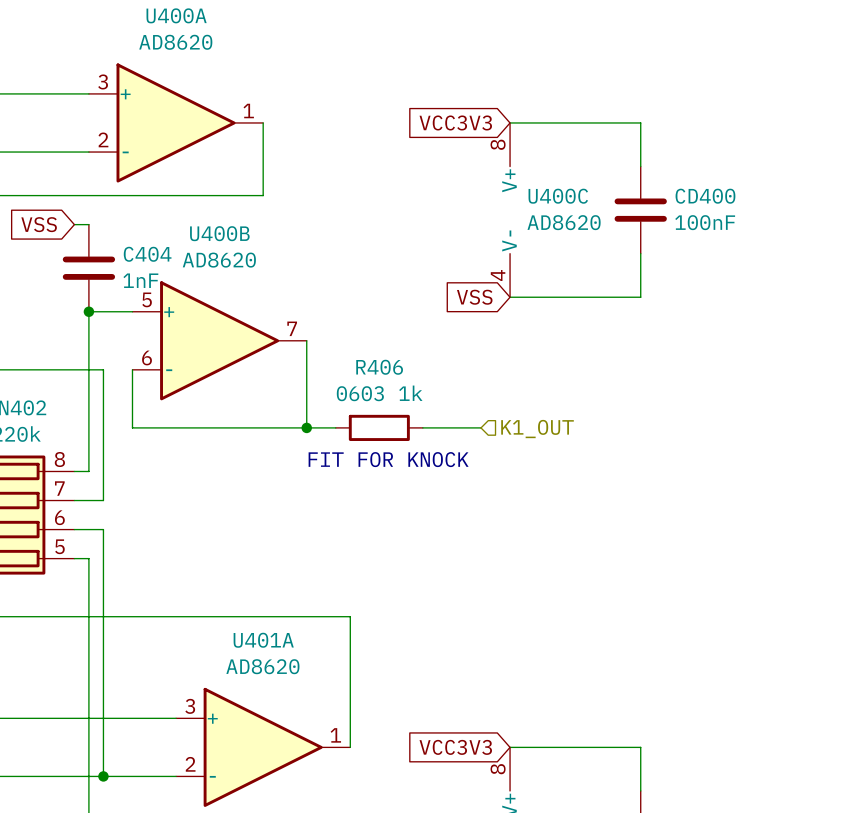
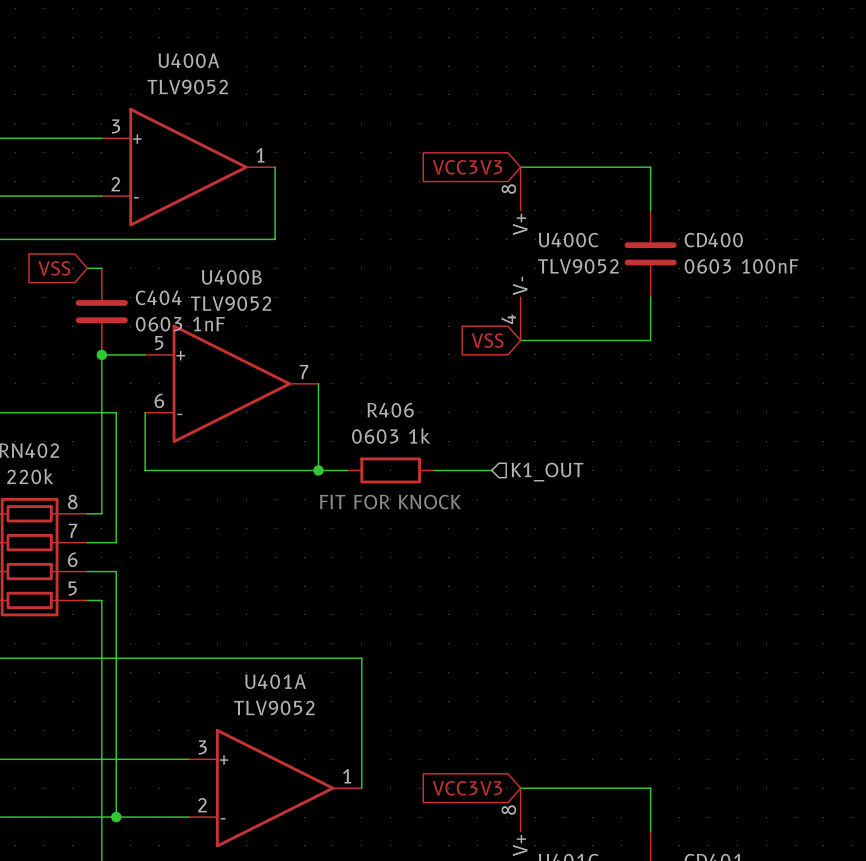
U400A value: AD8620 (175, 42) -> TLV9052 (187, 87)
U400C value: AD8620 (564, 222) -> TLV9052 (578, 266)
CD400 value: 100nF (705, 222) -> 0603 100nF (741, 266)
U400B value: AD8620 (219, 260) -> TLV9052 (231, 303)
C404 value: 1nF (140, 280) -> 0603 1nF (180, 324)
U401A value: AD8620 (262, 666) -> TLV9052 (274, 708)

